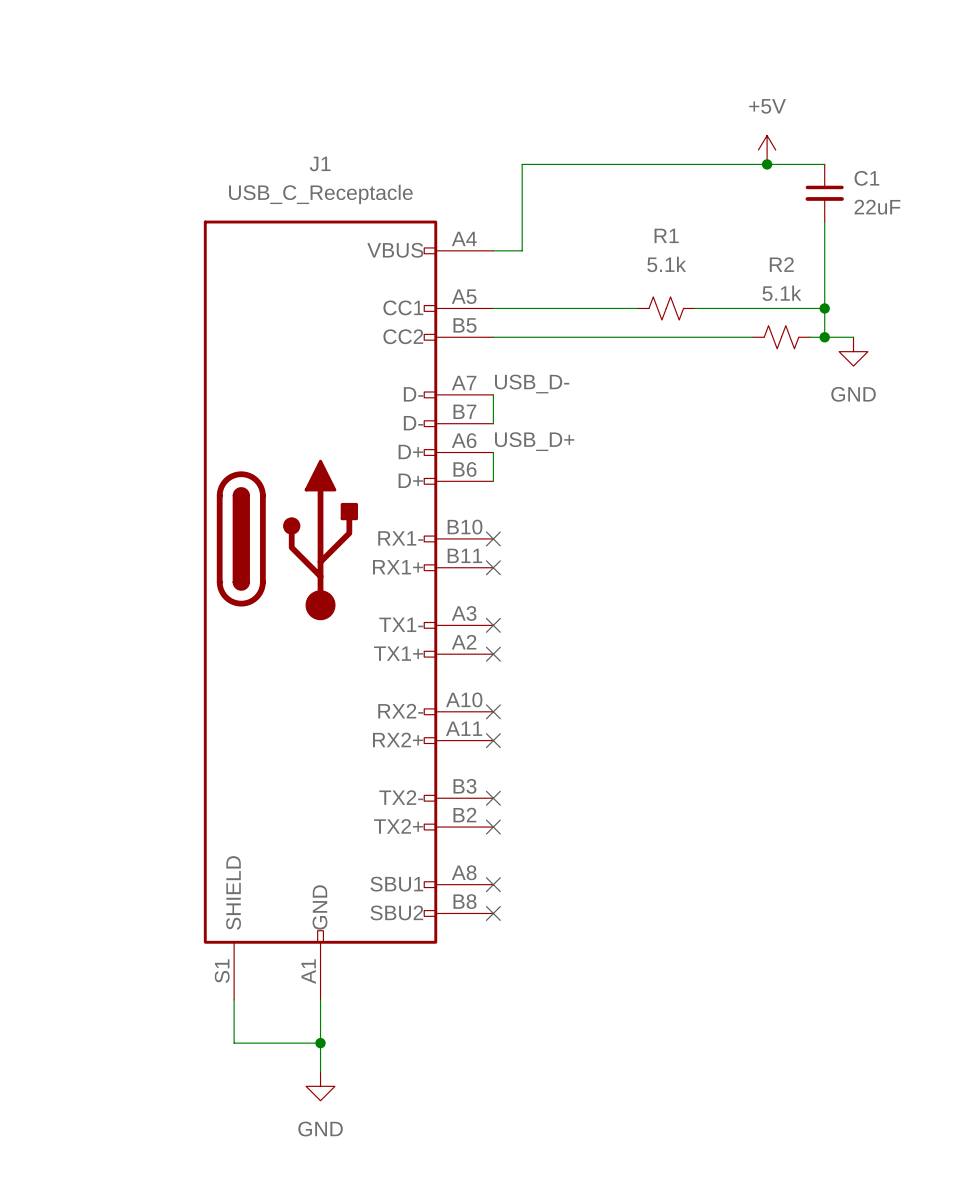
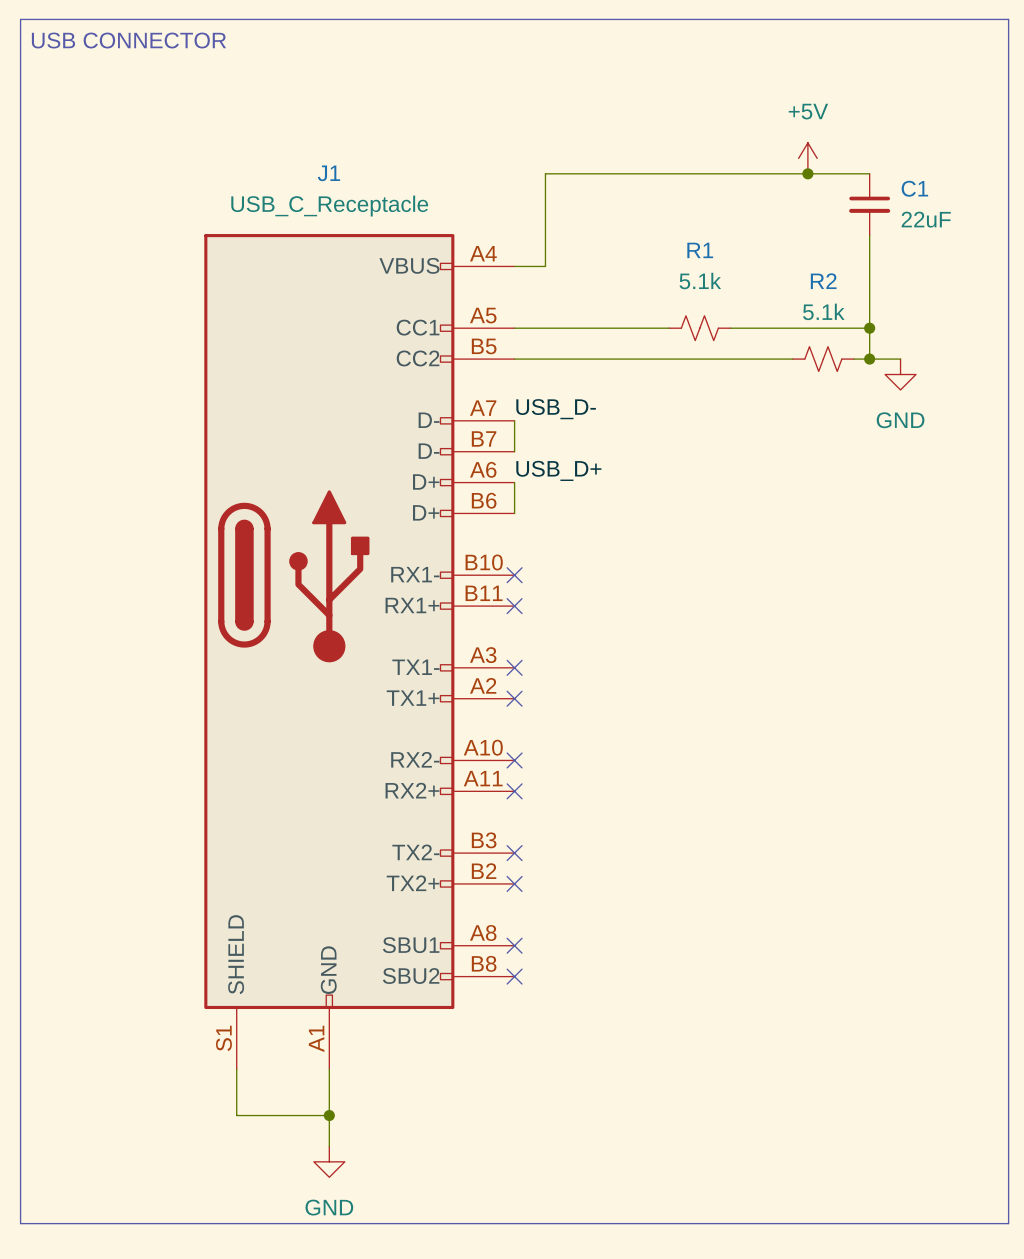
line: none -> (20, 19) (1008, 19) (1008, 1223) (20, 1223) (20, 19)
text: none -> USB CONNECTOR (128, 40)

